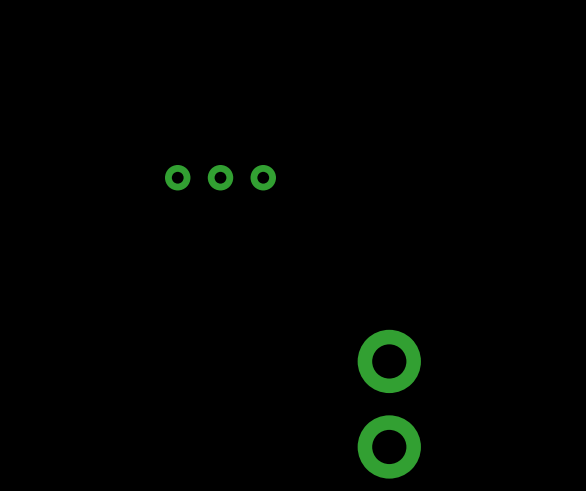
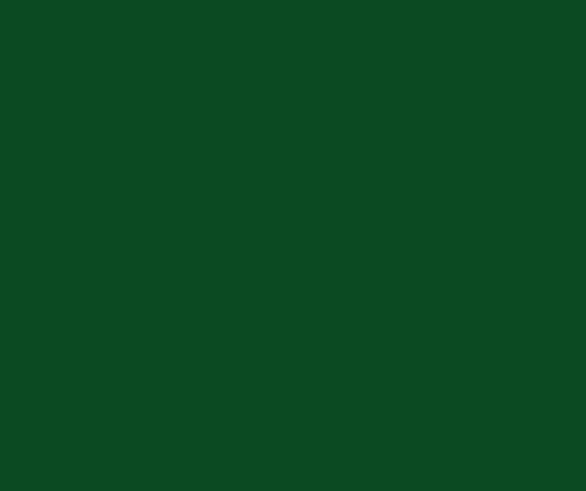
via: (177, 177) -> none
via: (220, 177) -> none
via: (263, 177) -> none
part: (389, 404) -> none

